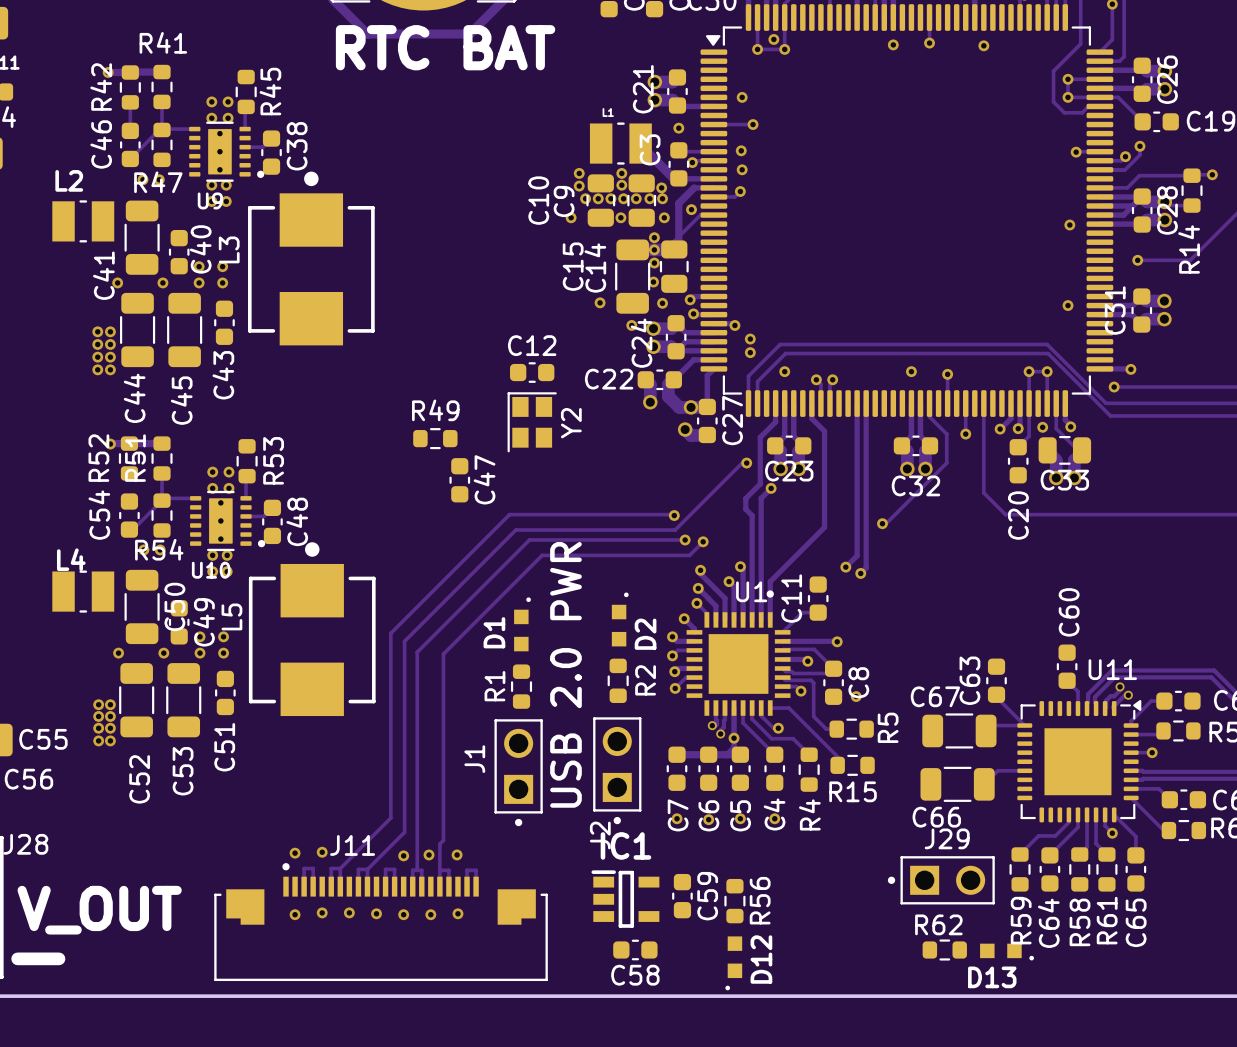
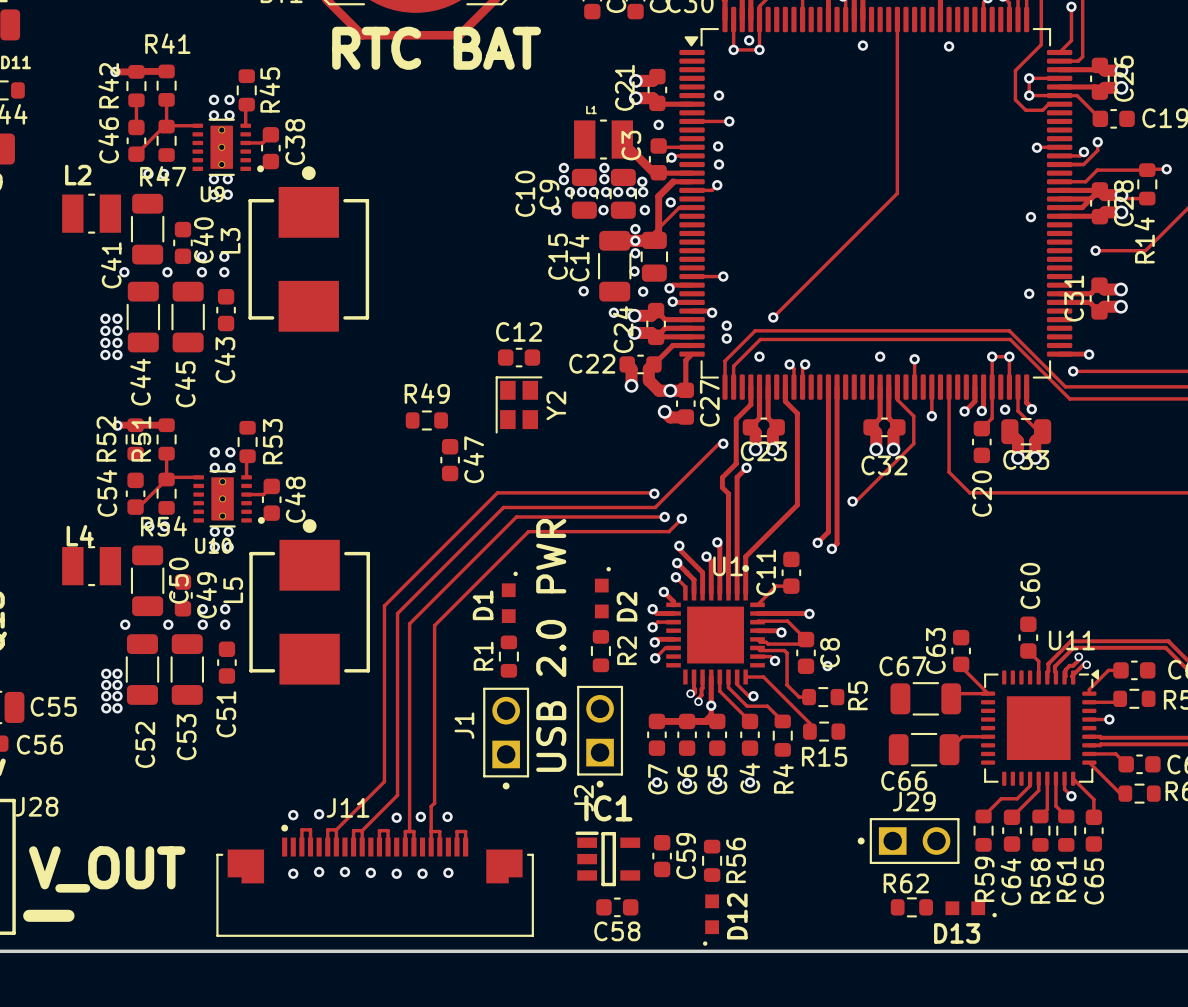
track: none -> (897, 43) (897, 193) (773, 317)
via: (929, 43) -> none
track: none -> (692, 276) (723, 276)
via: none -> (723, 276)
via: none -> (773, 317)

